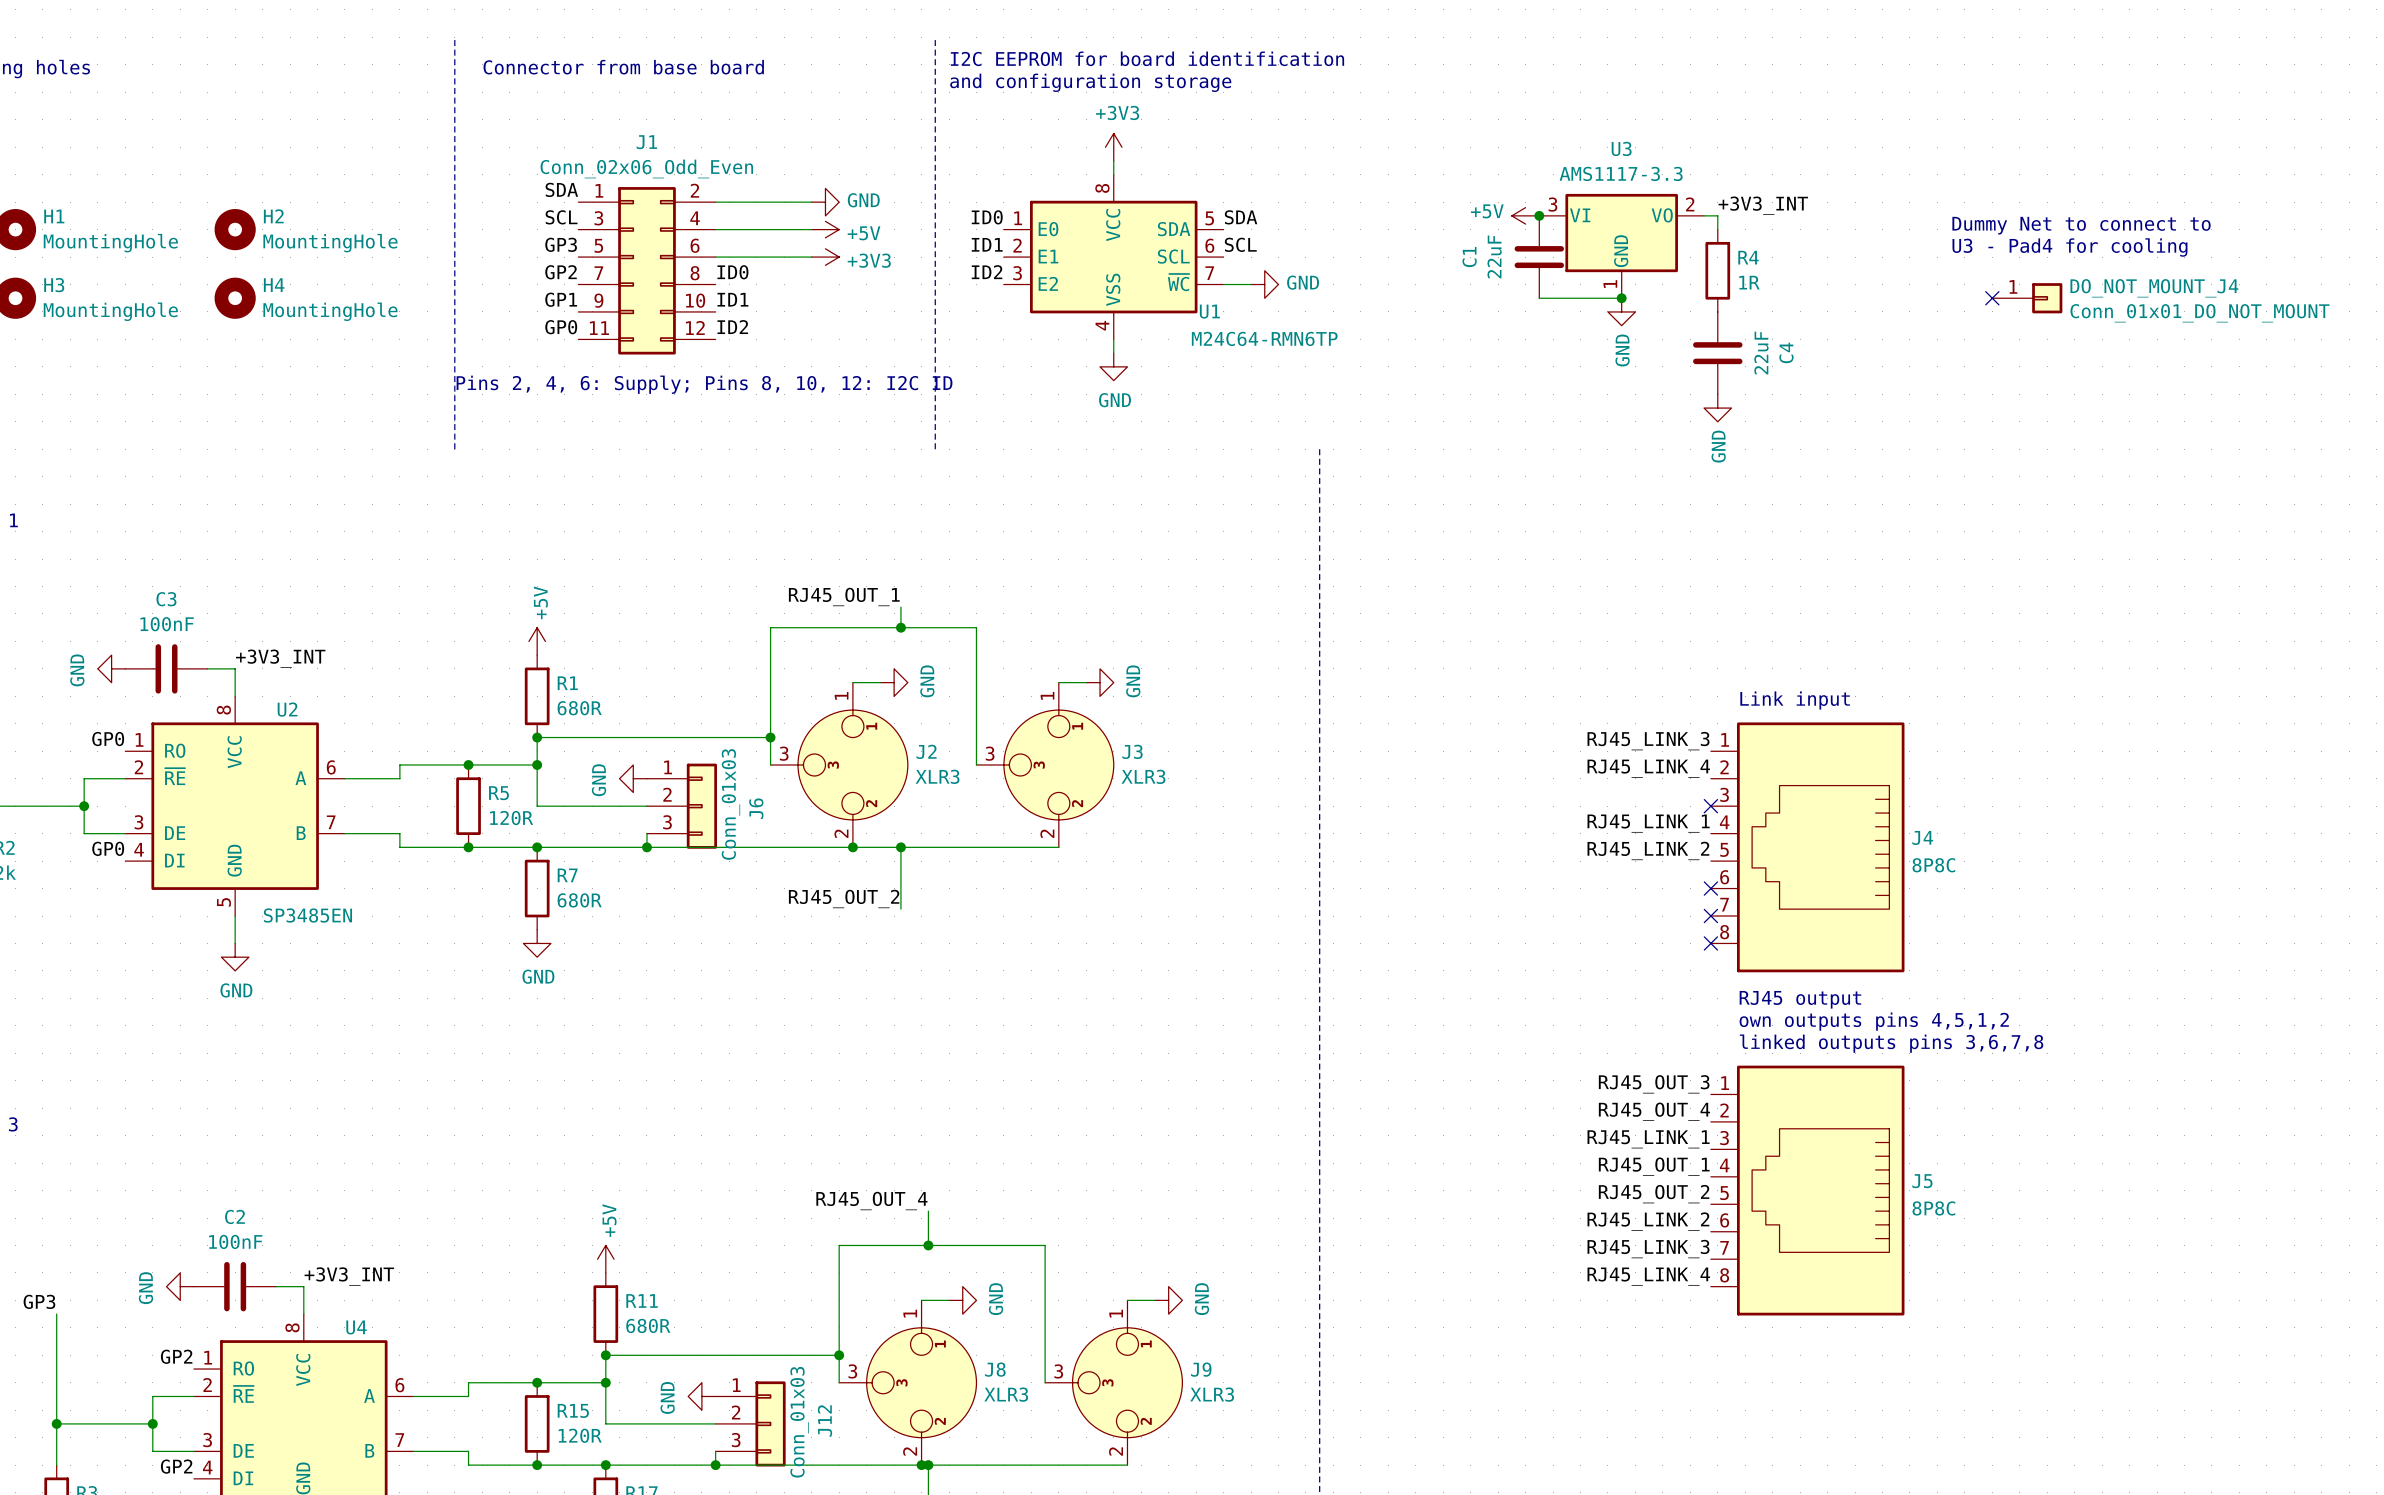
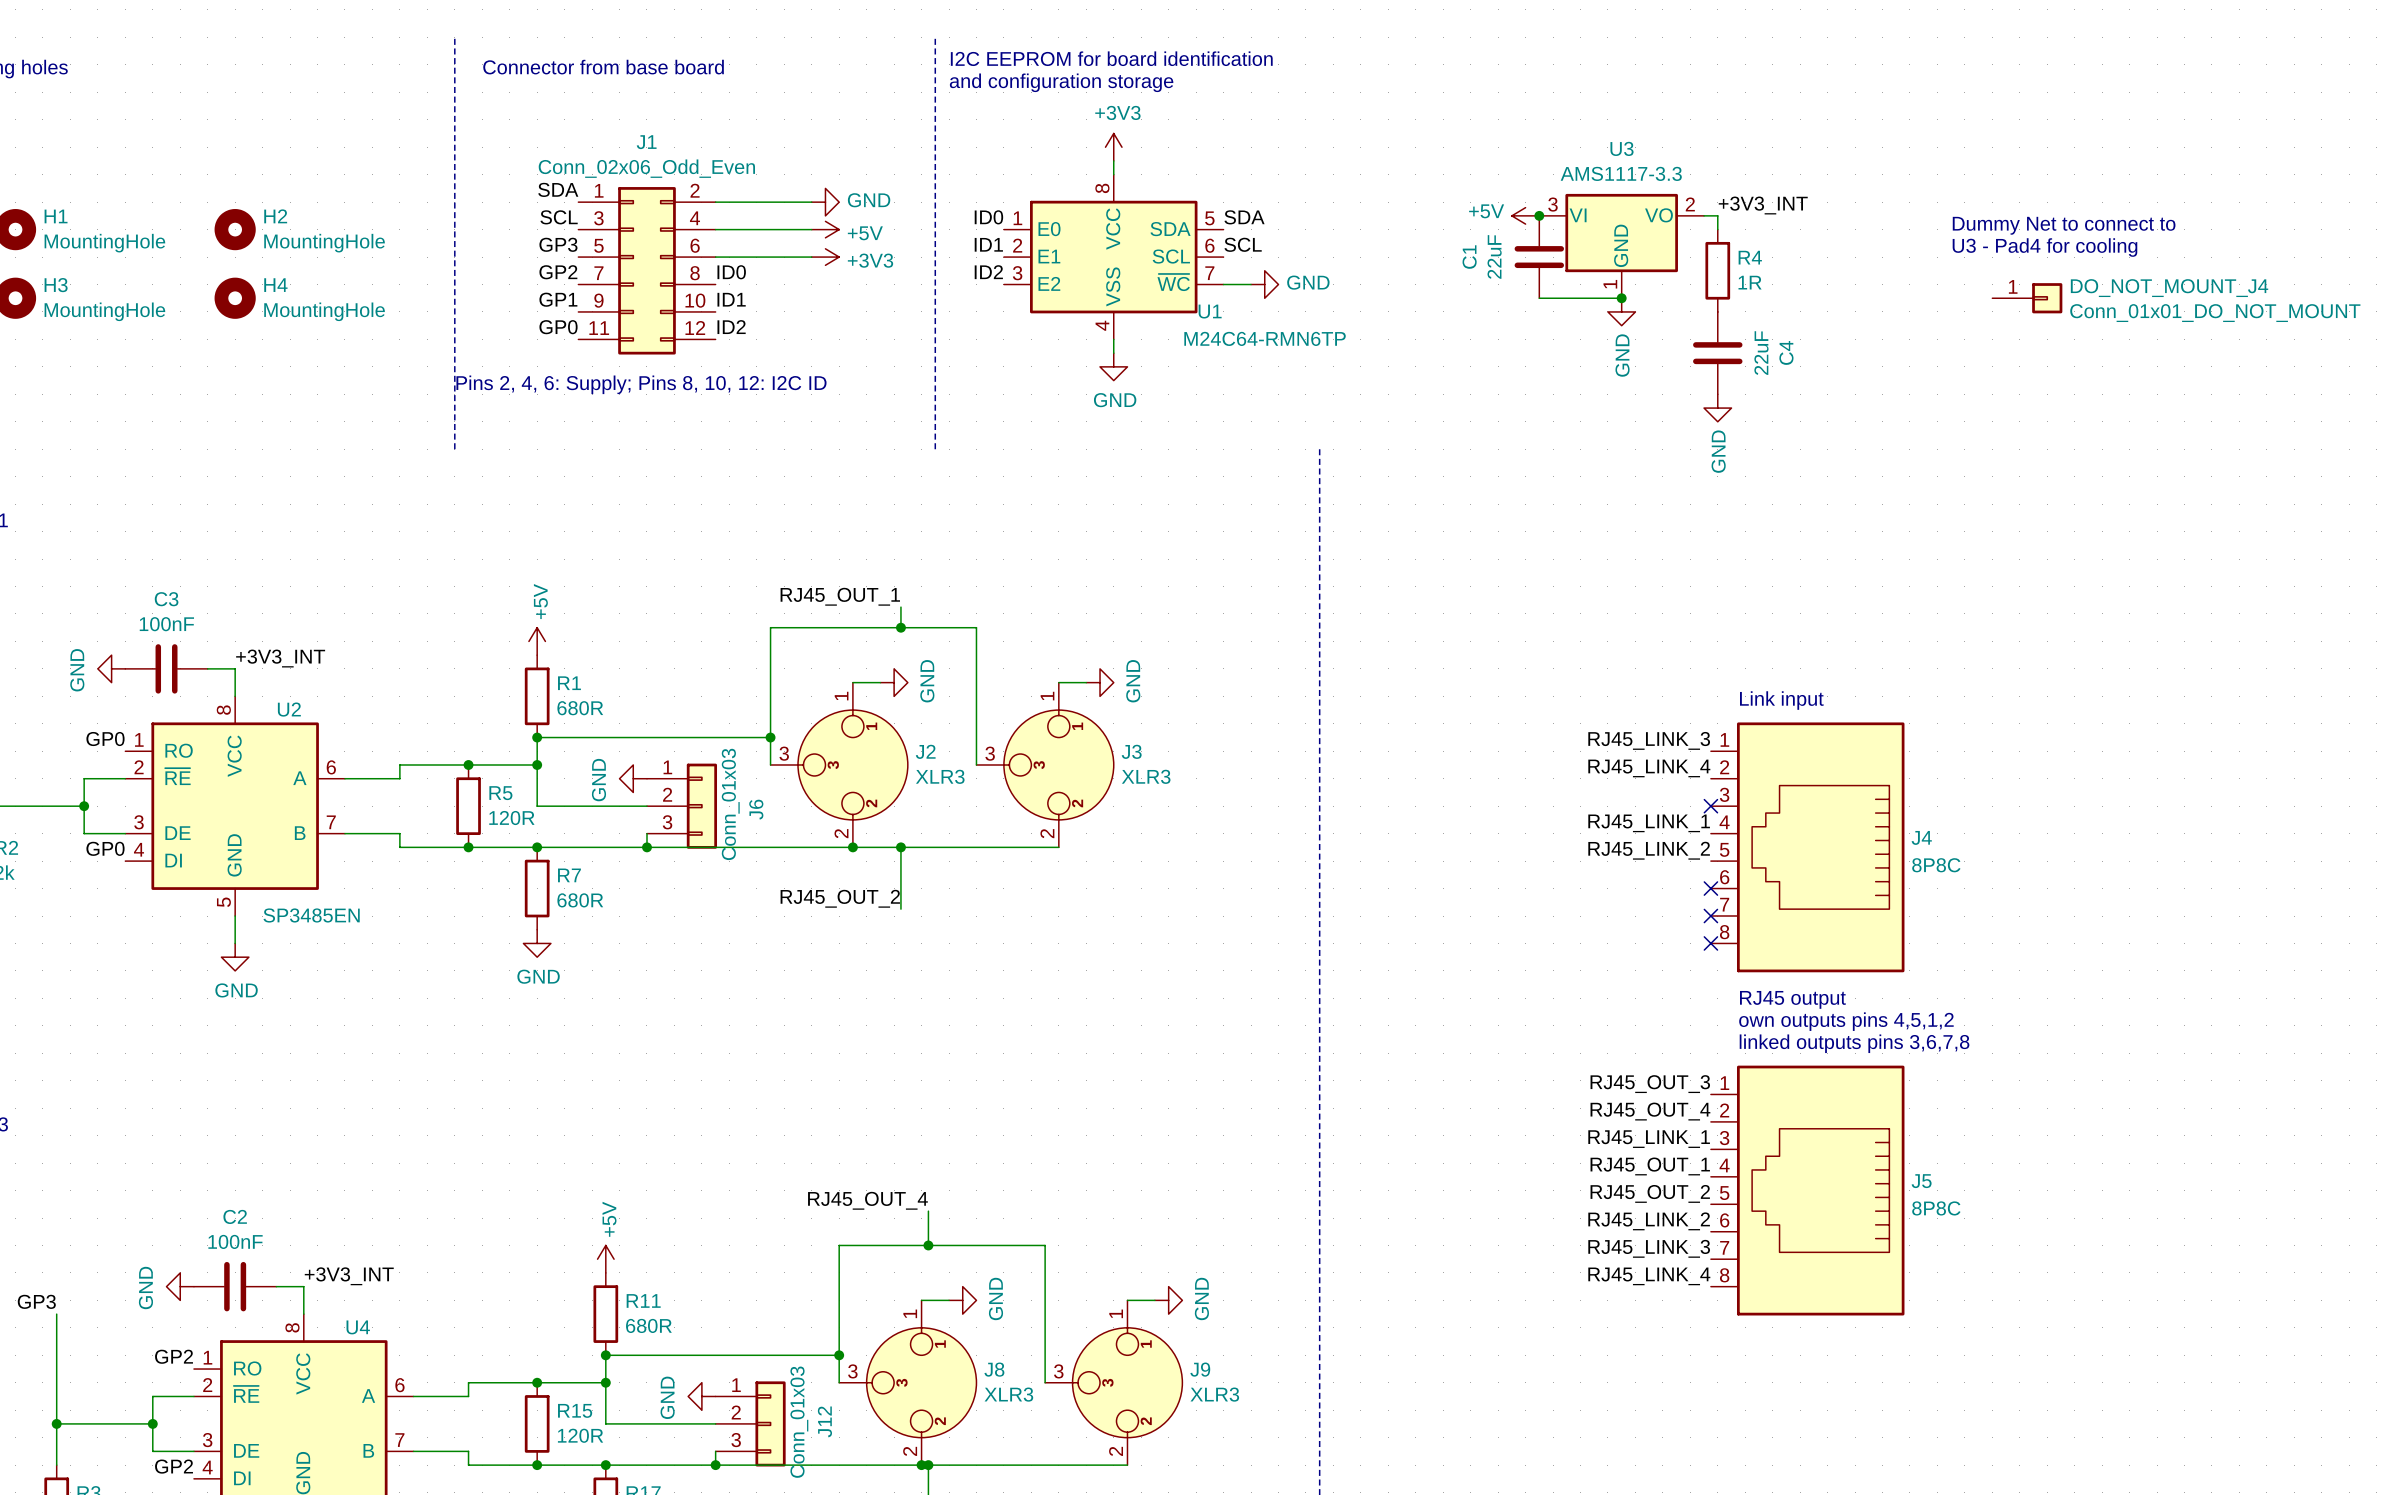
no-connect mark: (1992, 298) -> none

